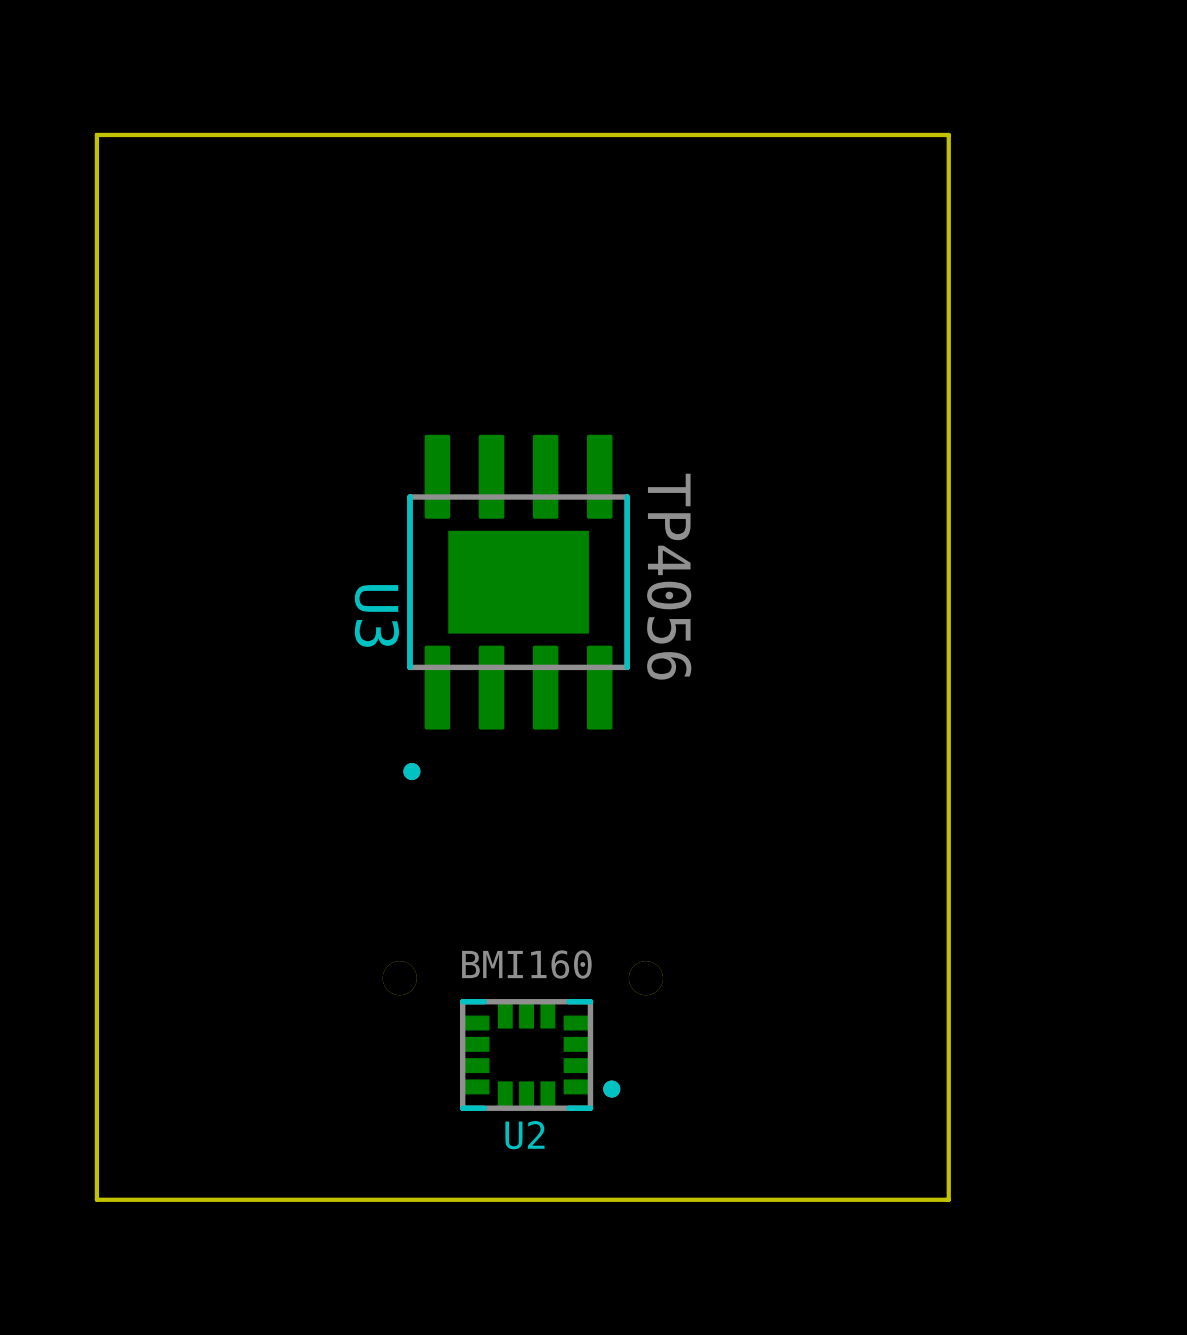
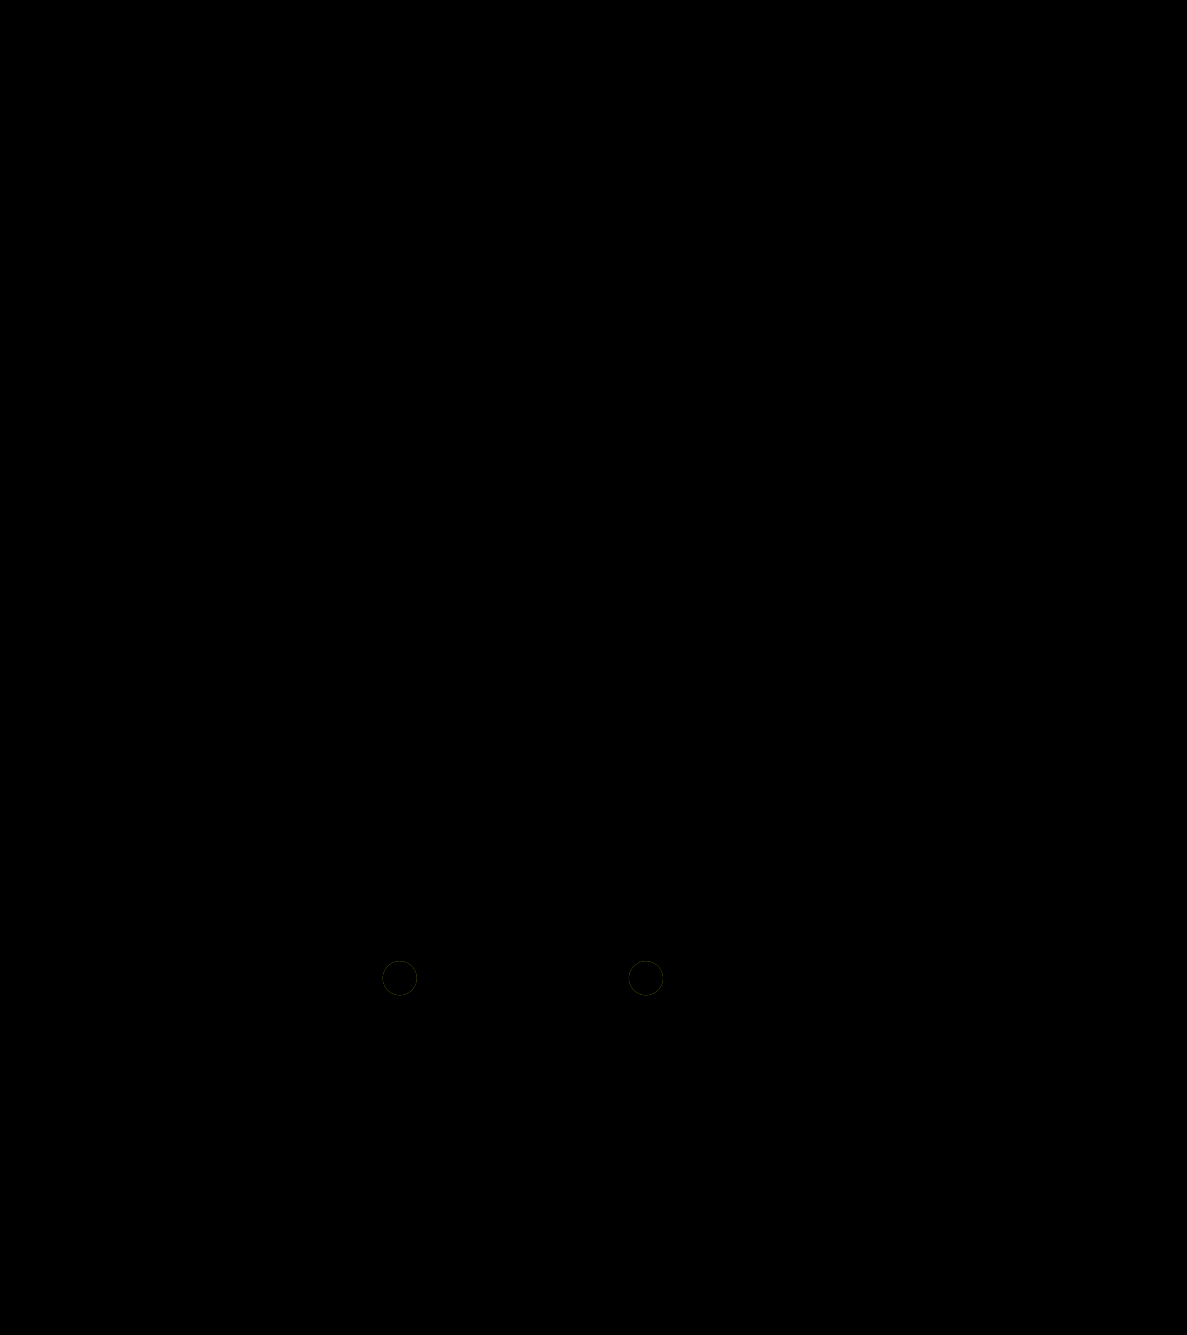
board edge: (948, 134) (96, 134) (96, 1199) (948, 1199) (948, 134) -> none
U3: TP4056 (516, 607) -> none
U2: BMI160 (540, 1054) -> none

